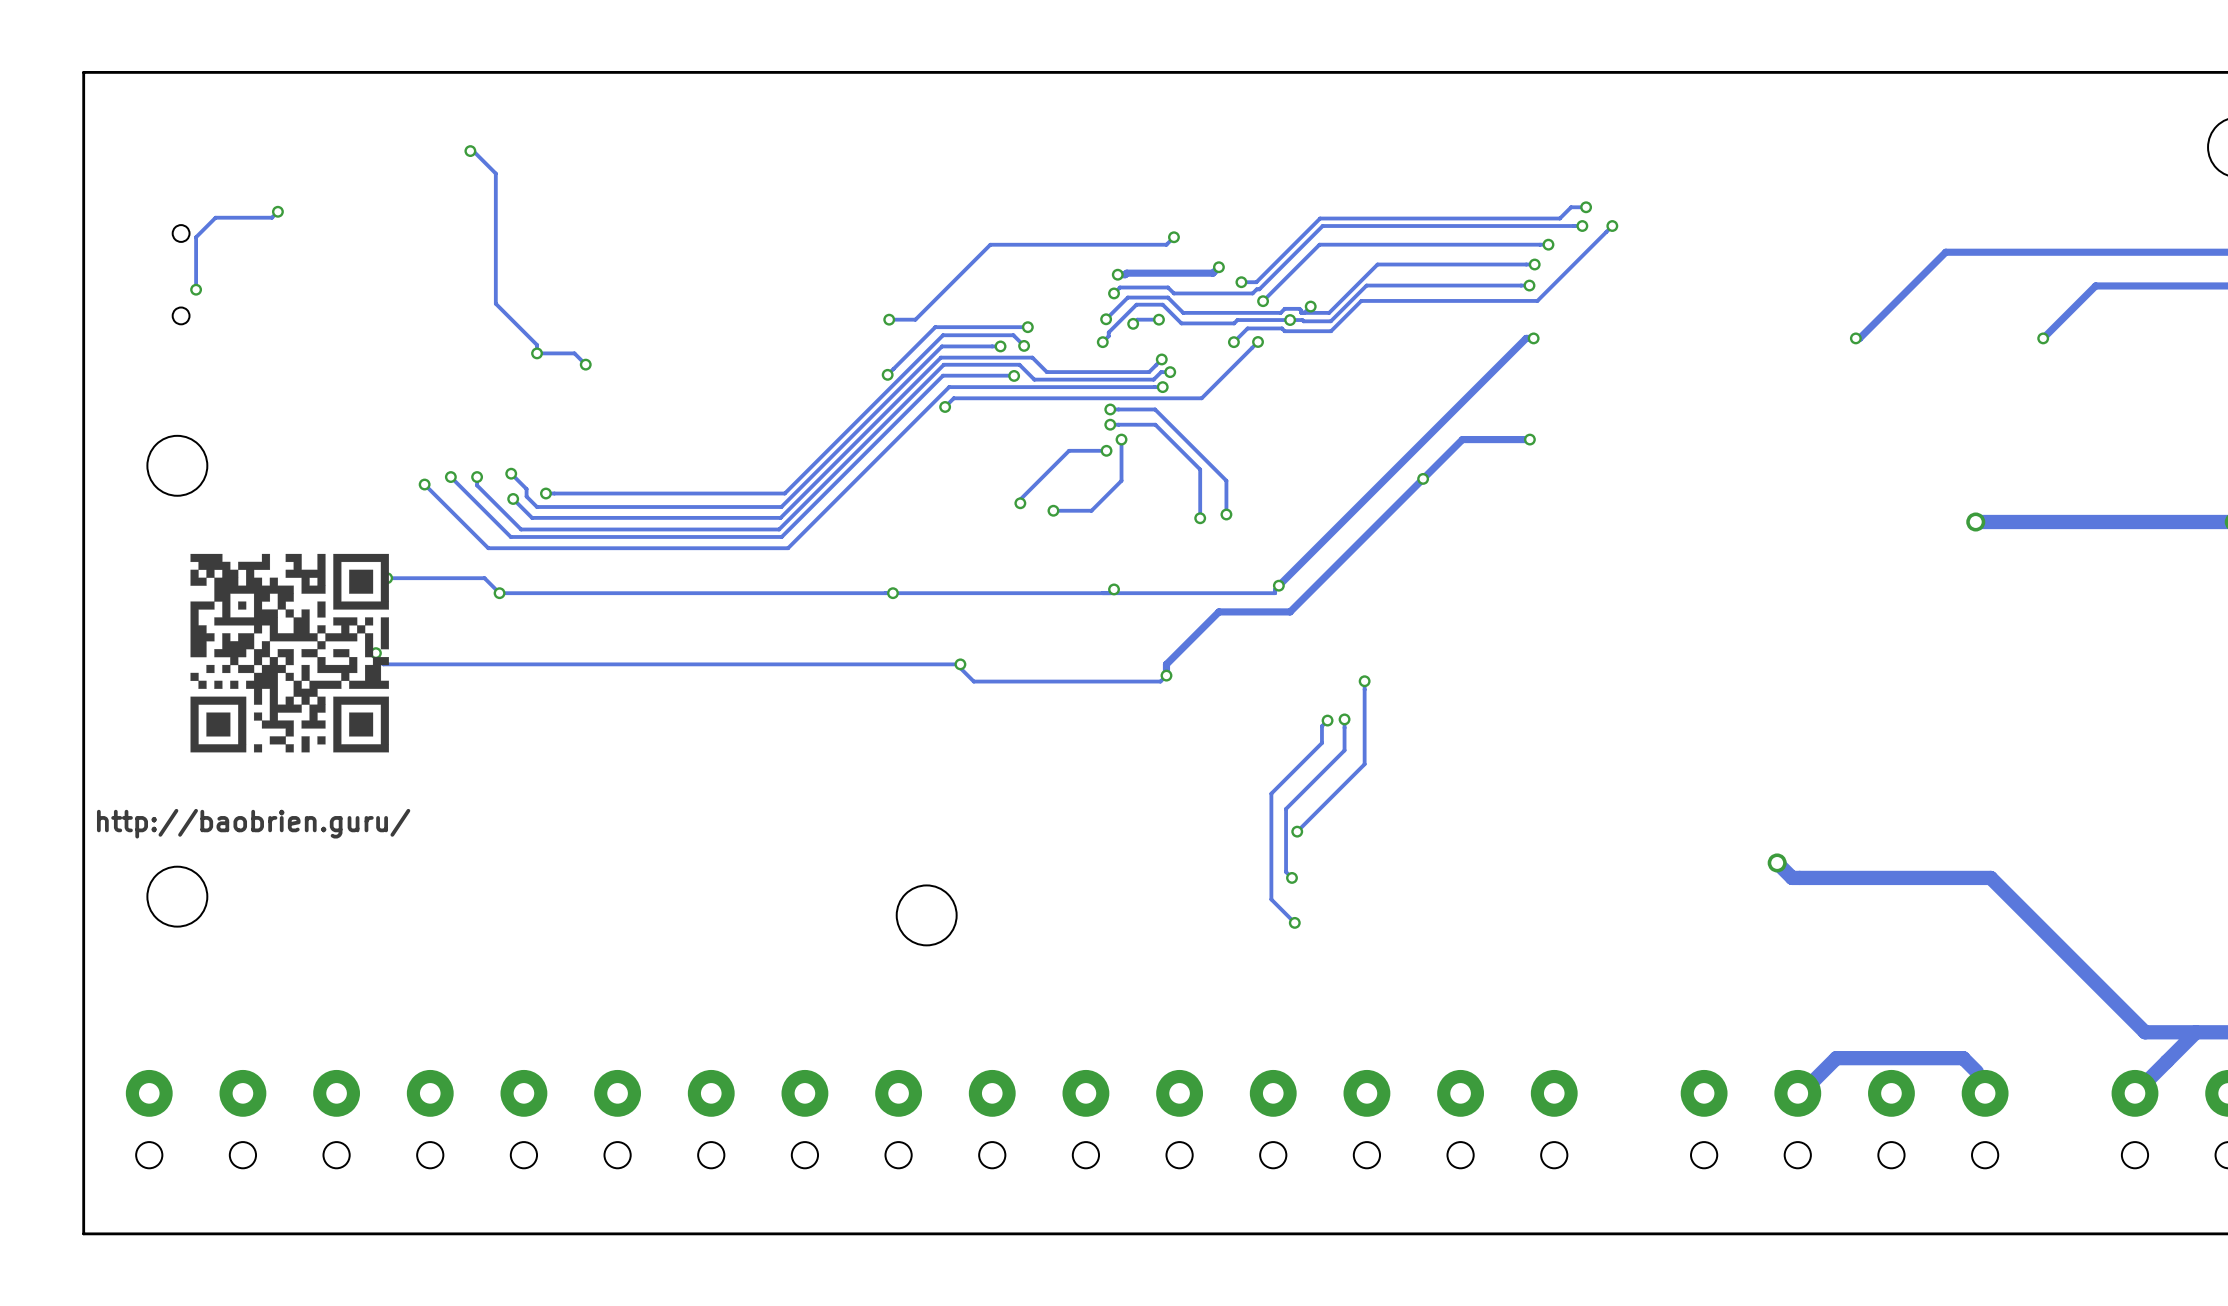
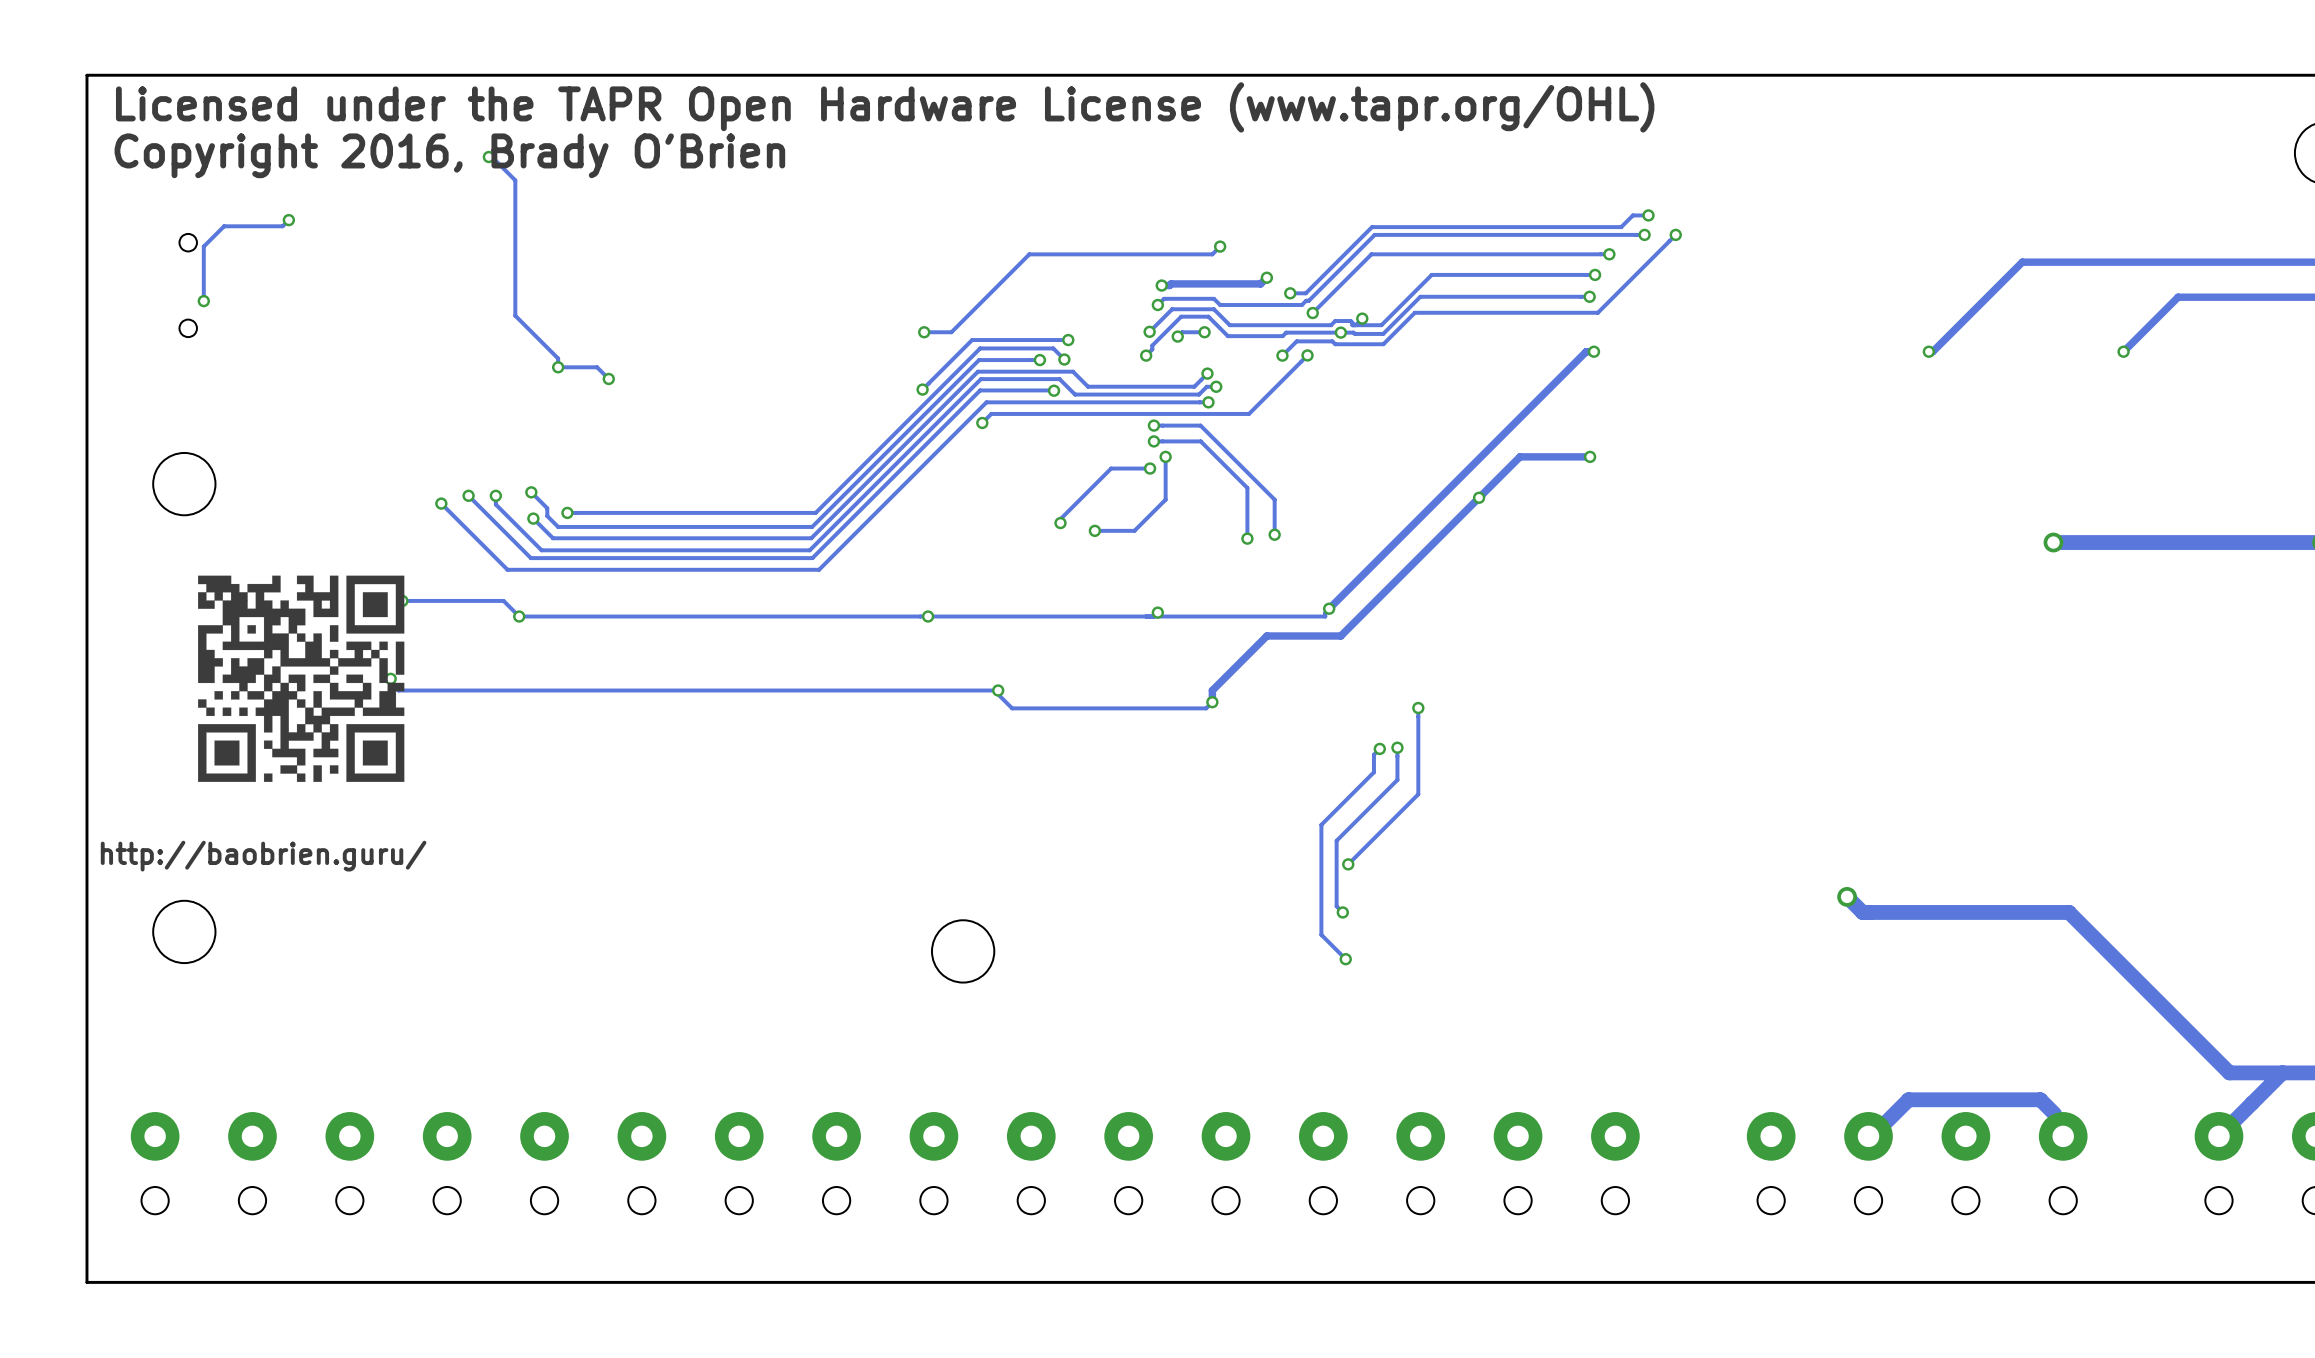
text: none -> Licensed under the TAPR Open Hardware License (www.tapr.org/OHL) (885, 107)
text: none -> Copyright 2016, Brady O'Brien (449, 155)

